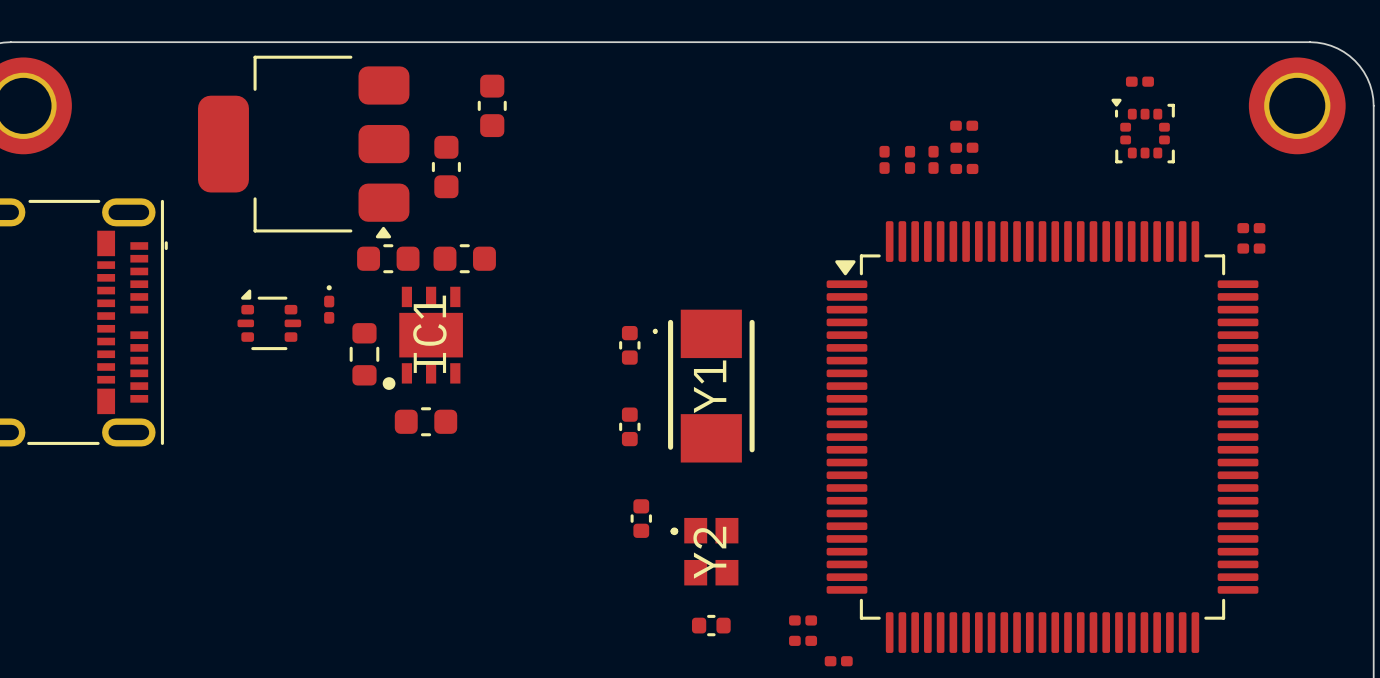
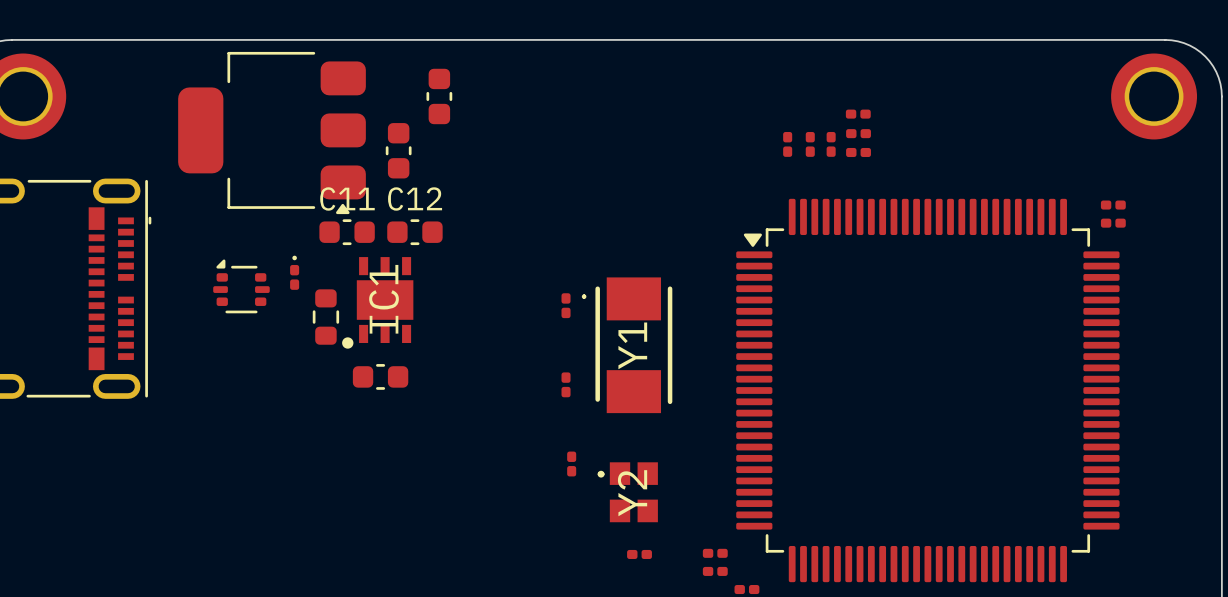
part: (1139, 81) -> none
part: (1143, 131) -> none
C11 name: none -> C11 (347, 198)
C12 name: none -> C12 (415, 198)
part footprint: [619, 325, 641, 365] -> [561, 293, 571, 319]
part footprint: [619, 407, 641, 447] -> [561, 372, 571, 398]
part footprint: [630, 499, 652, 538] -> [567, 451, 577, 477]
part footprint: [691, 614, 731, 637] -> [627, 549, 652, 559]

